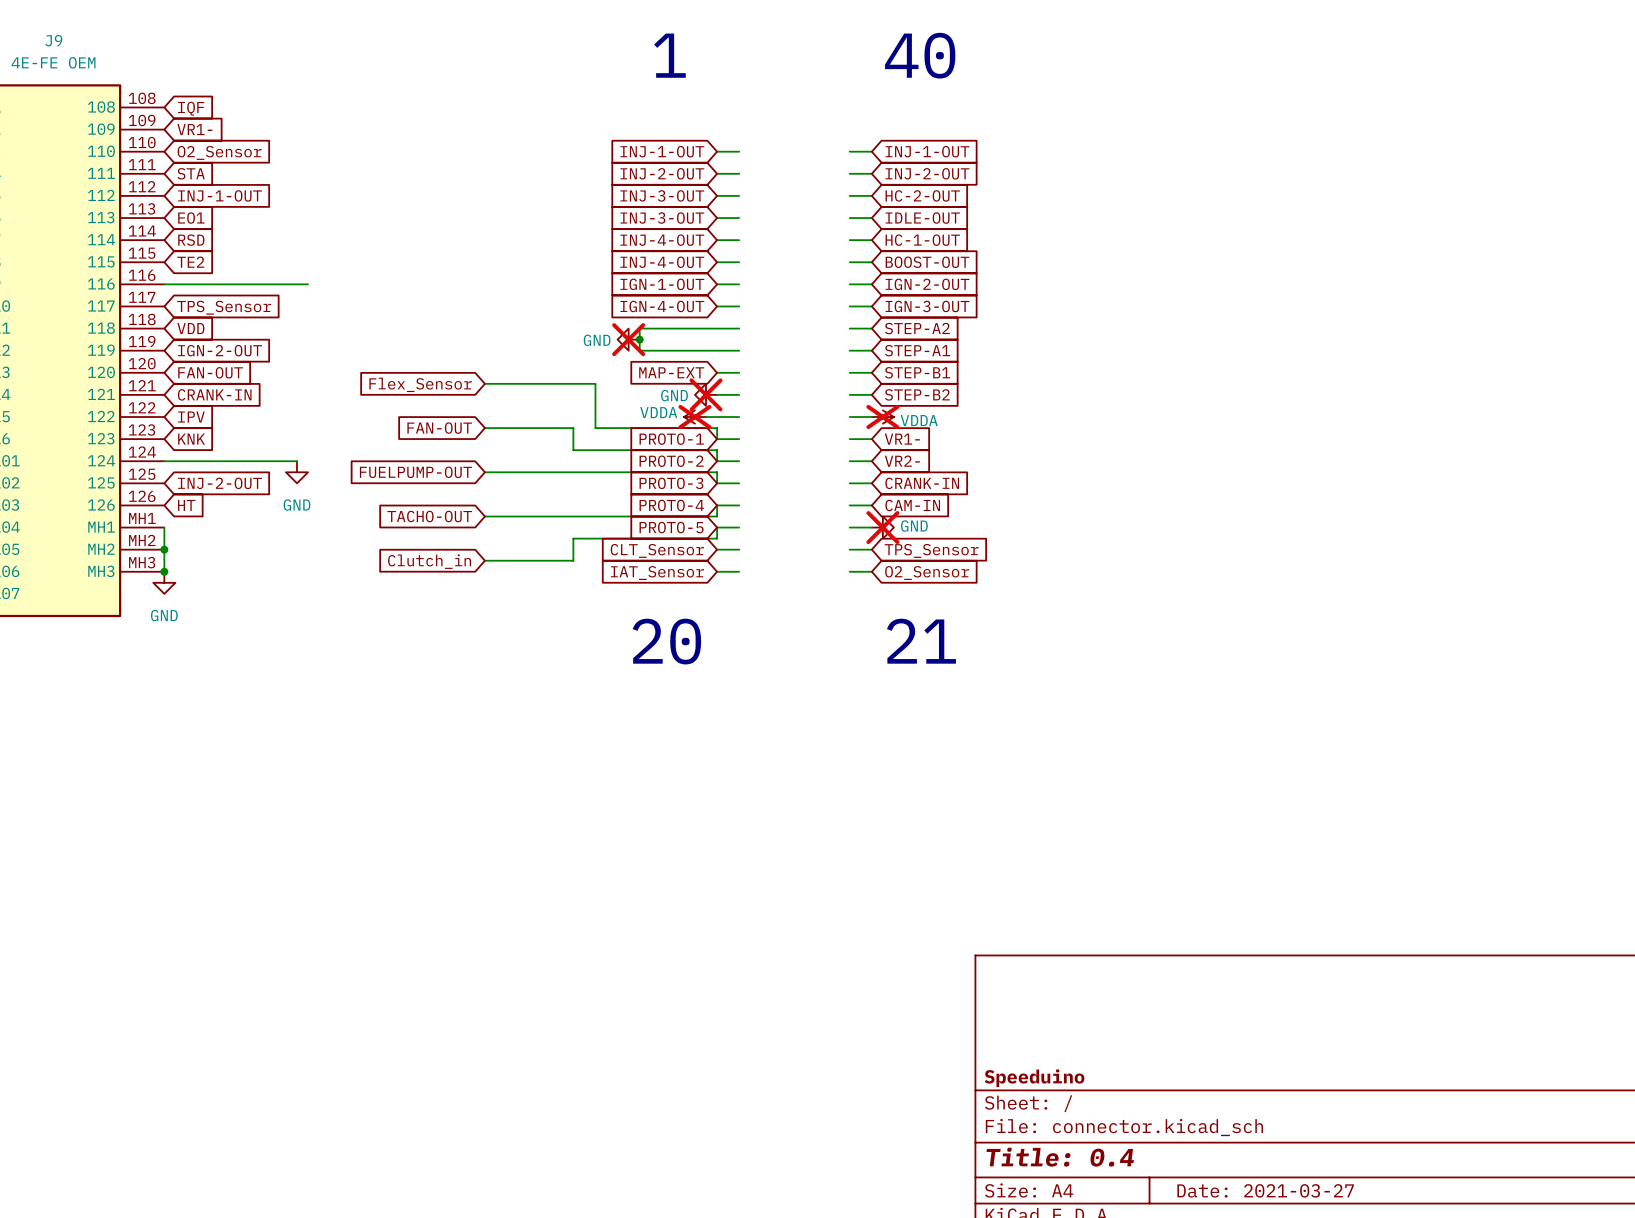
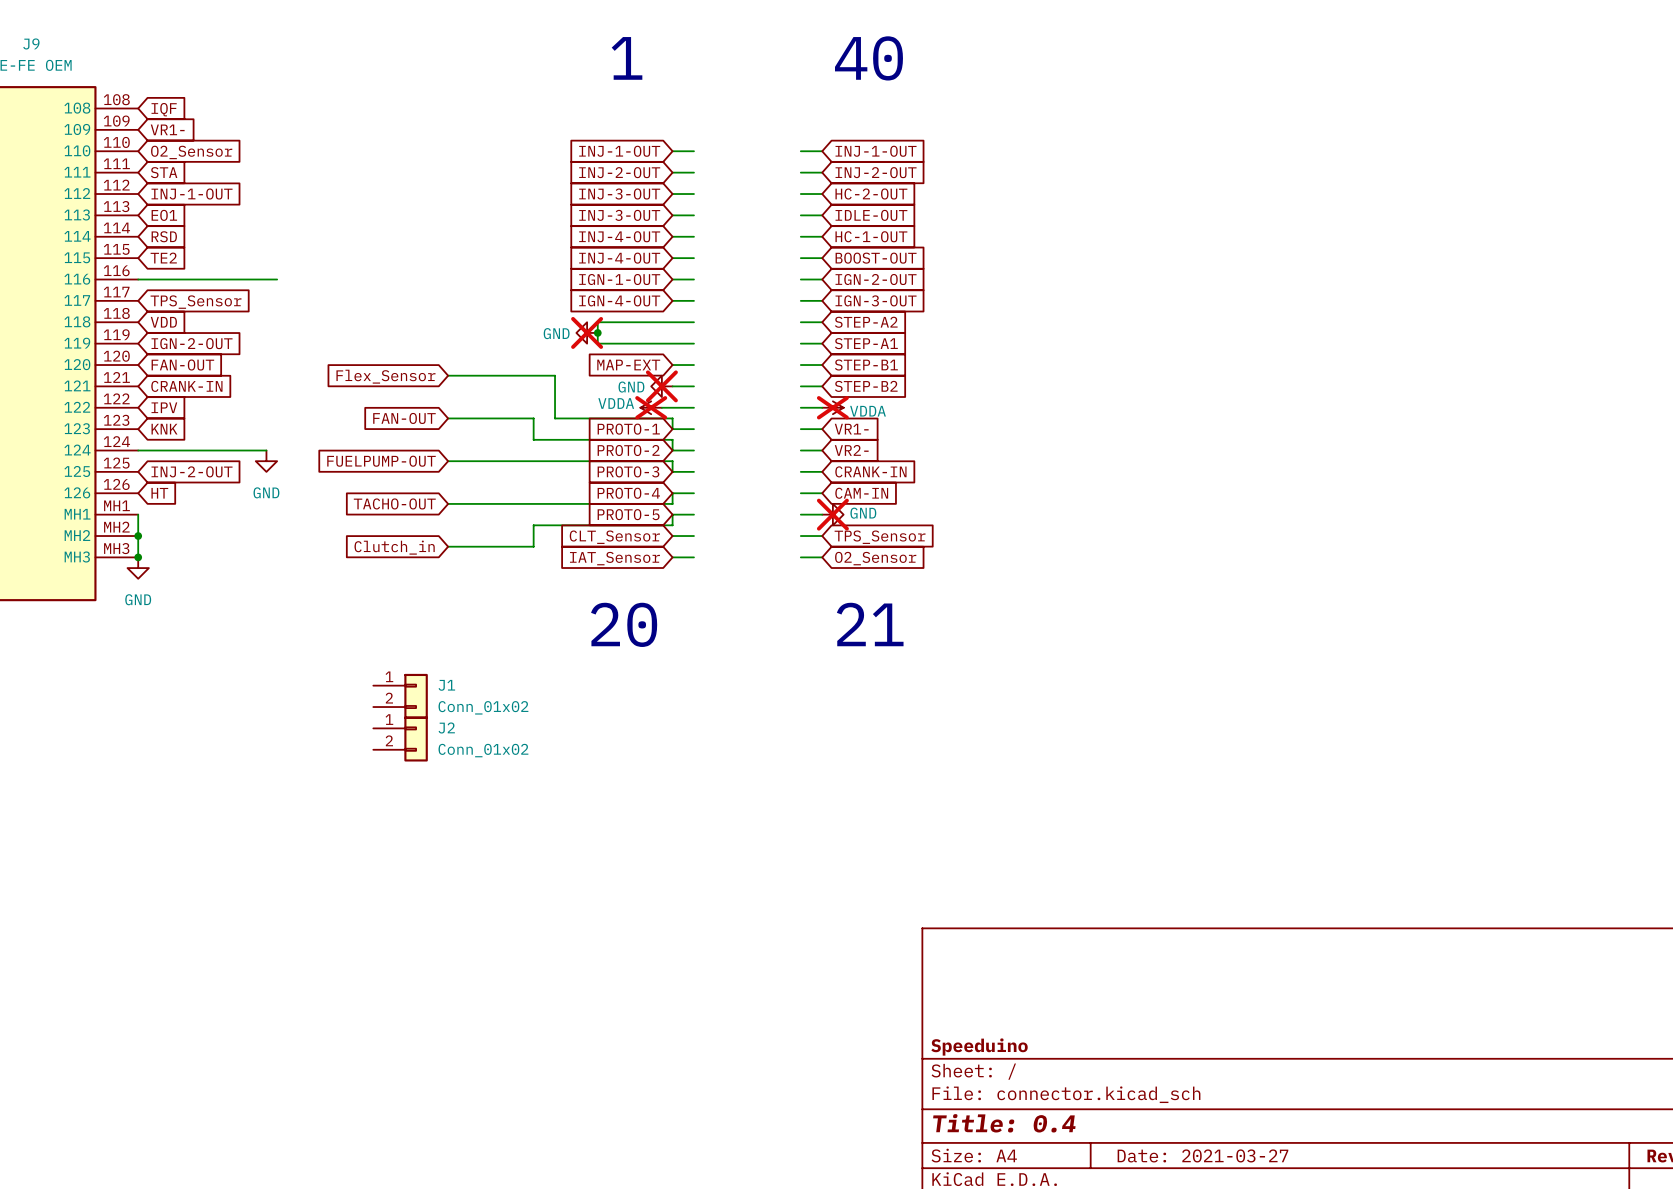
J1: none -> Conn_01x02 (400, 696)
J2: none -> Conn_01x02 (400, 739)

